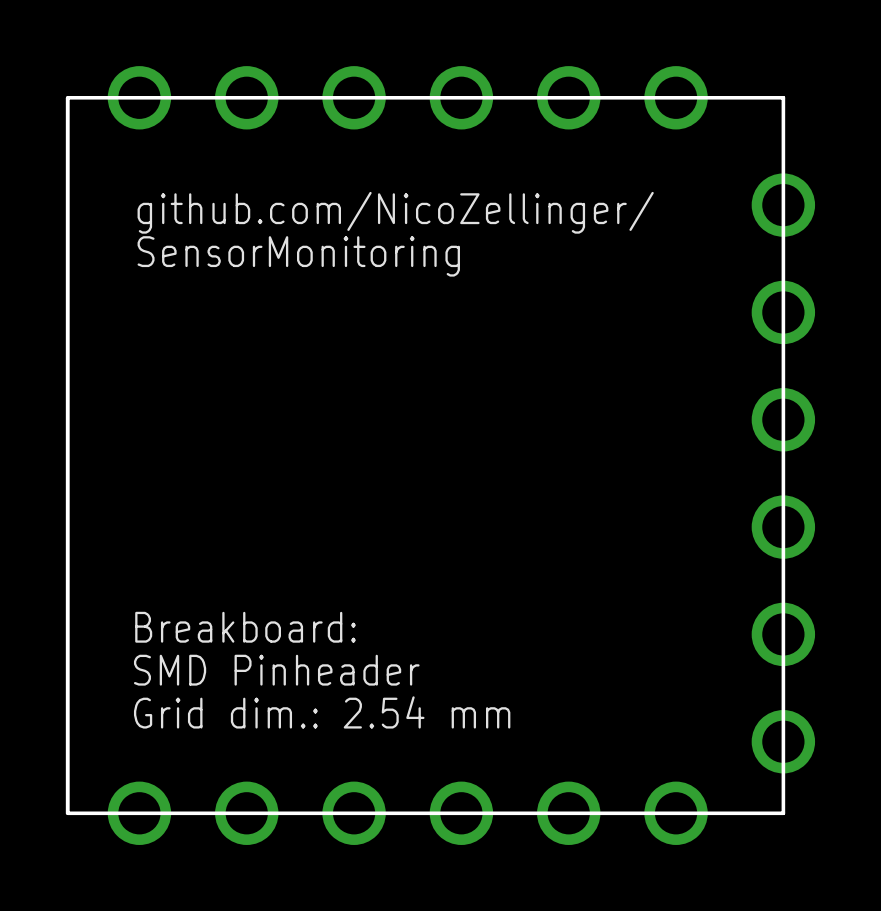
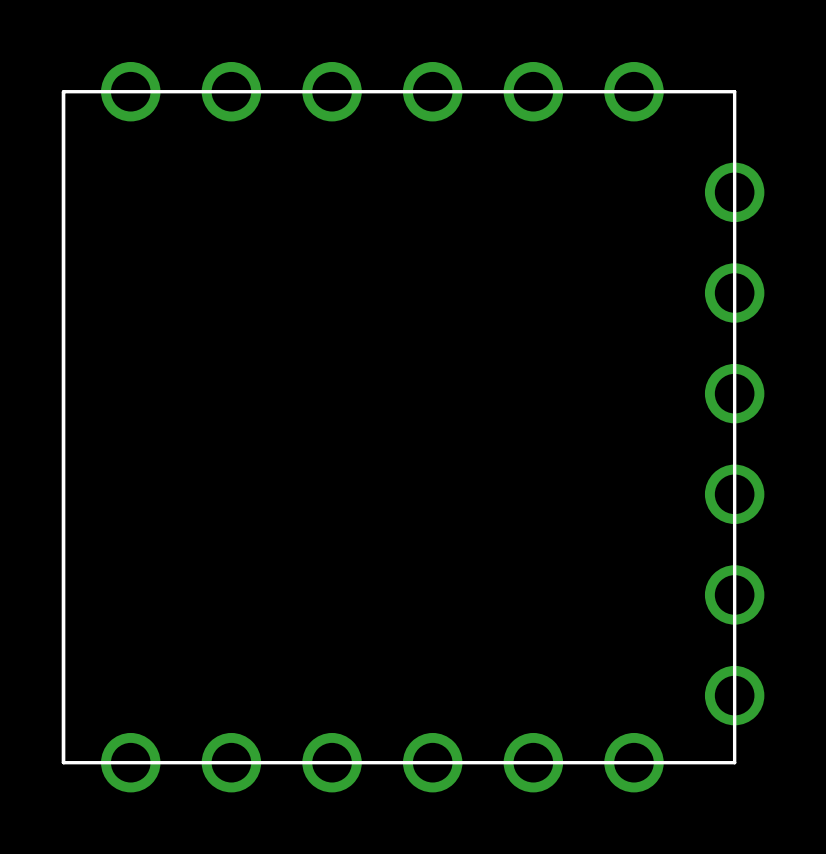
text: github.com/NicoZellinger/ (395, 212) -> none
text: SensorMonitoring (298, 256) -> none
text: Breakboard: (245, 627) -> none
text: SMD Pinheader (276, 670) -> none
text: Grid dim.: 2.54 mm (322, 712) -> none

